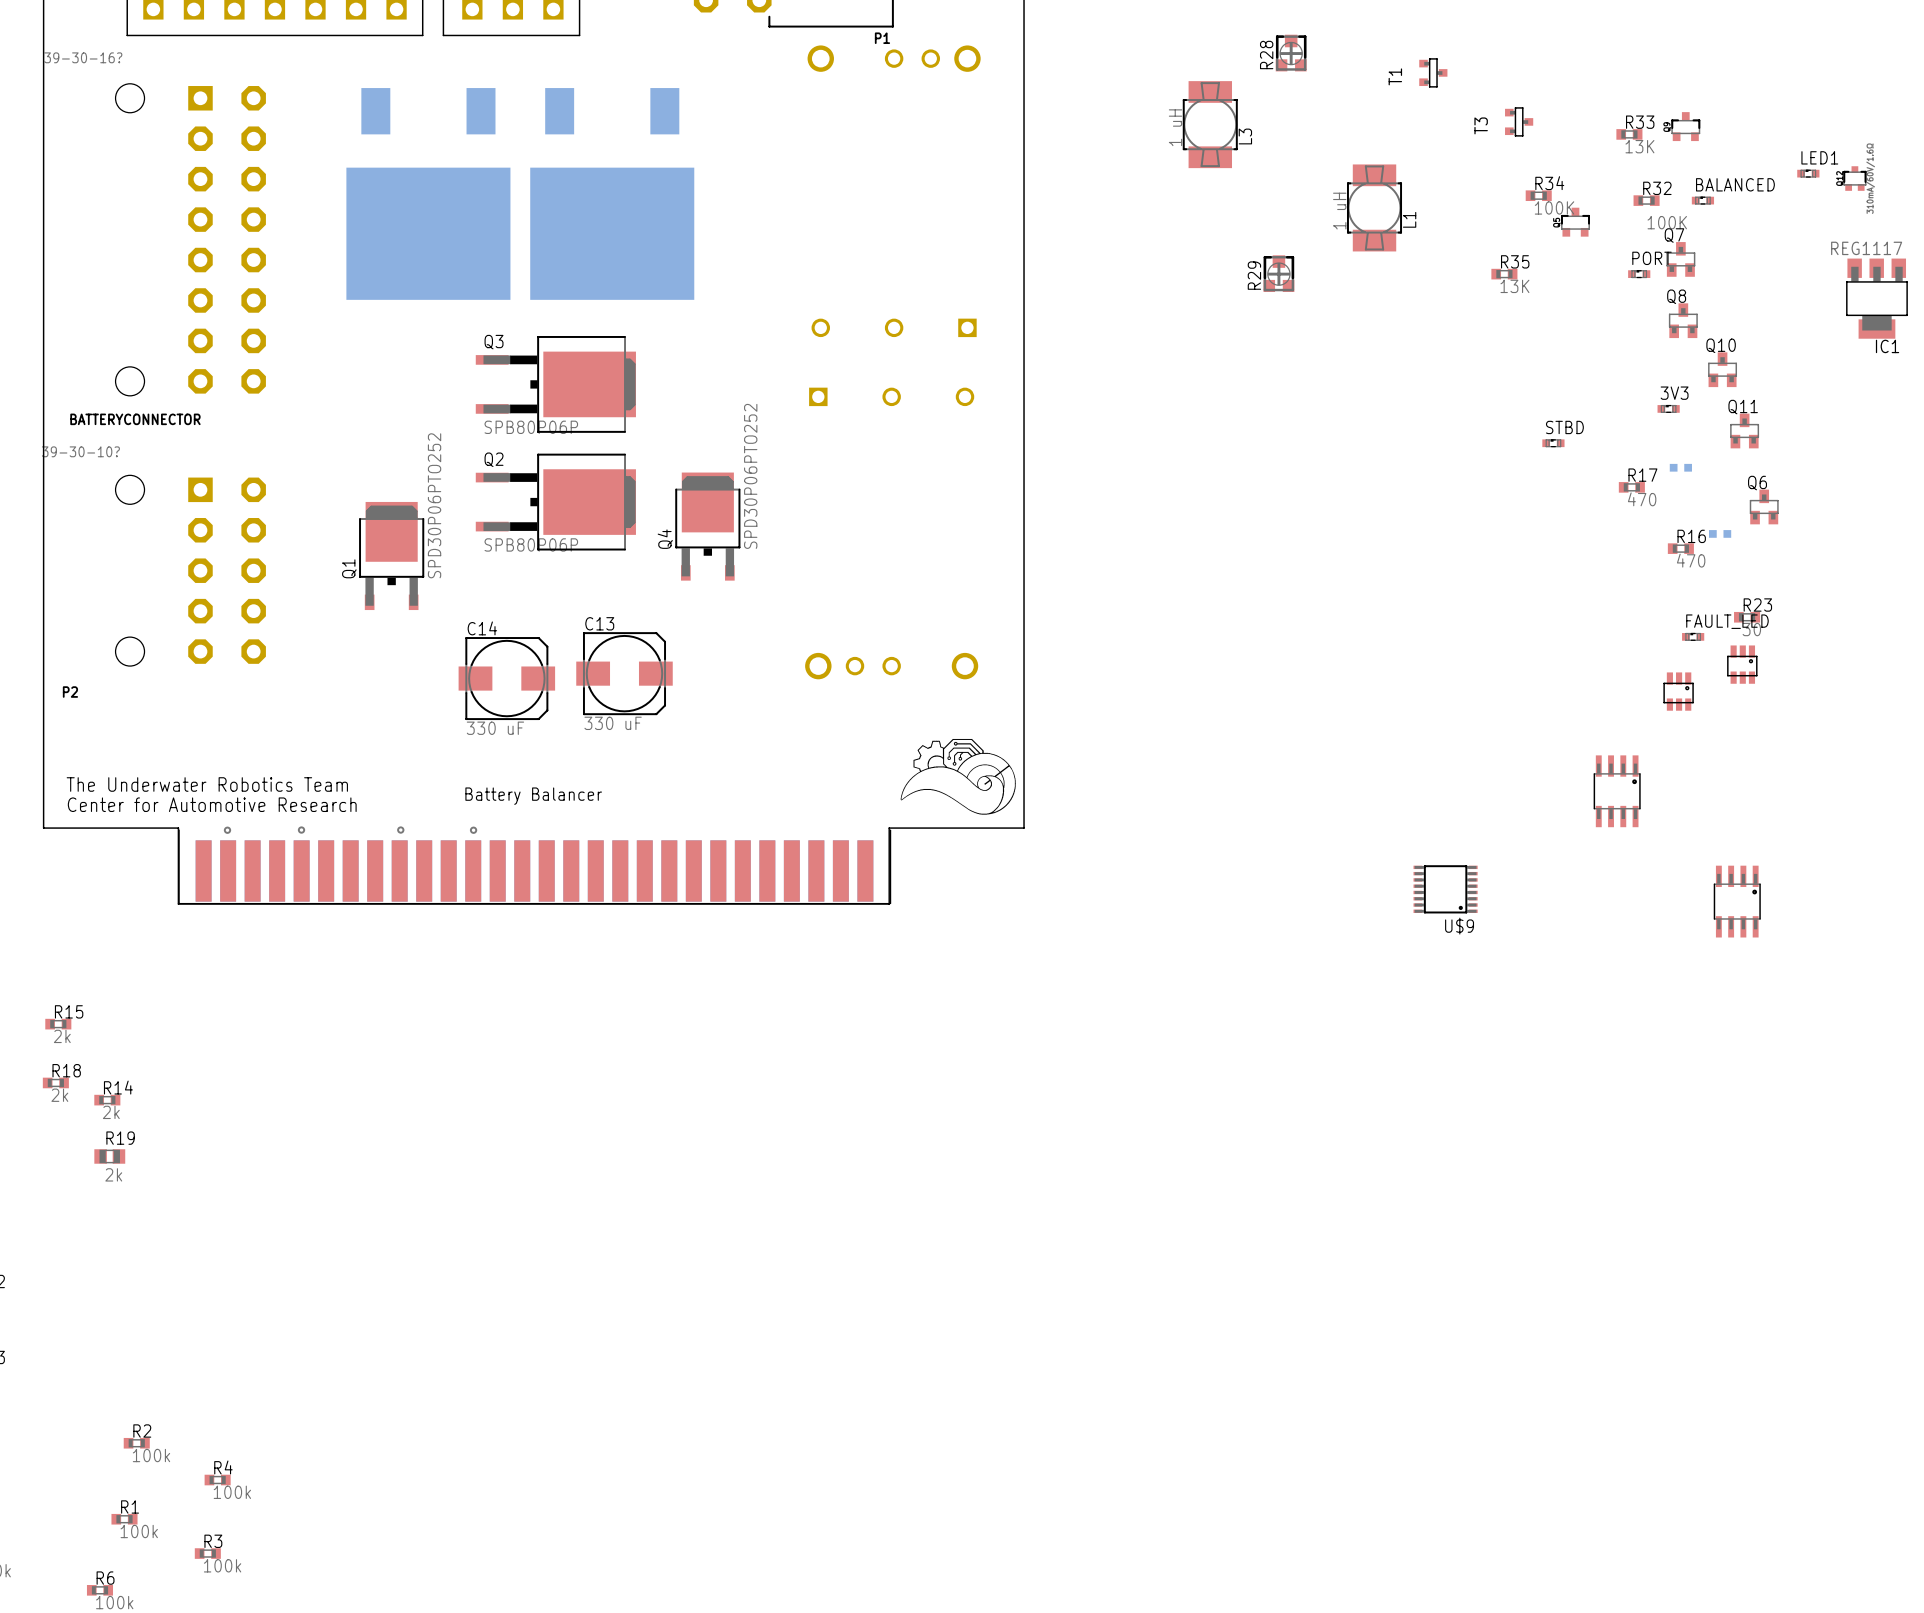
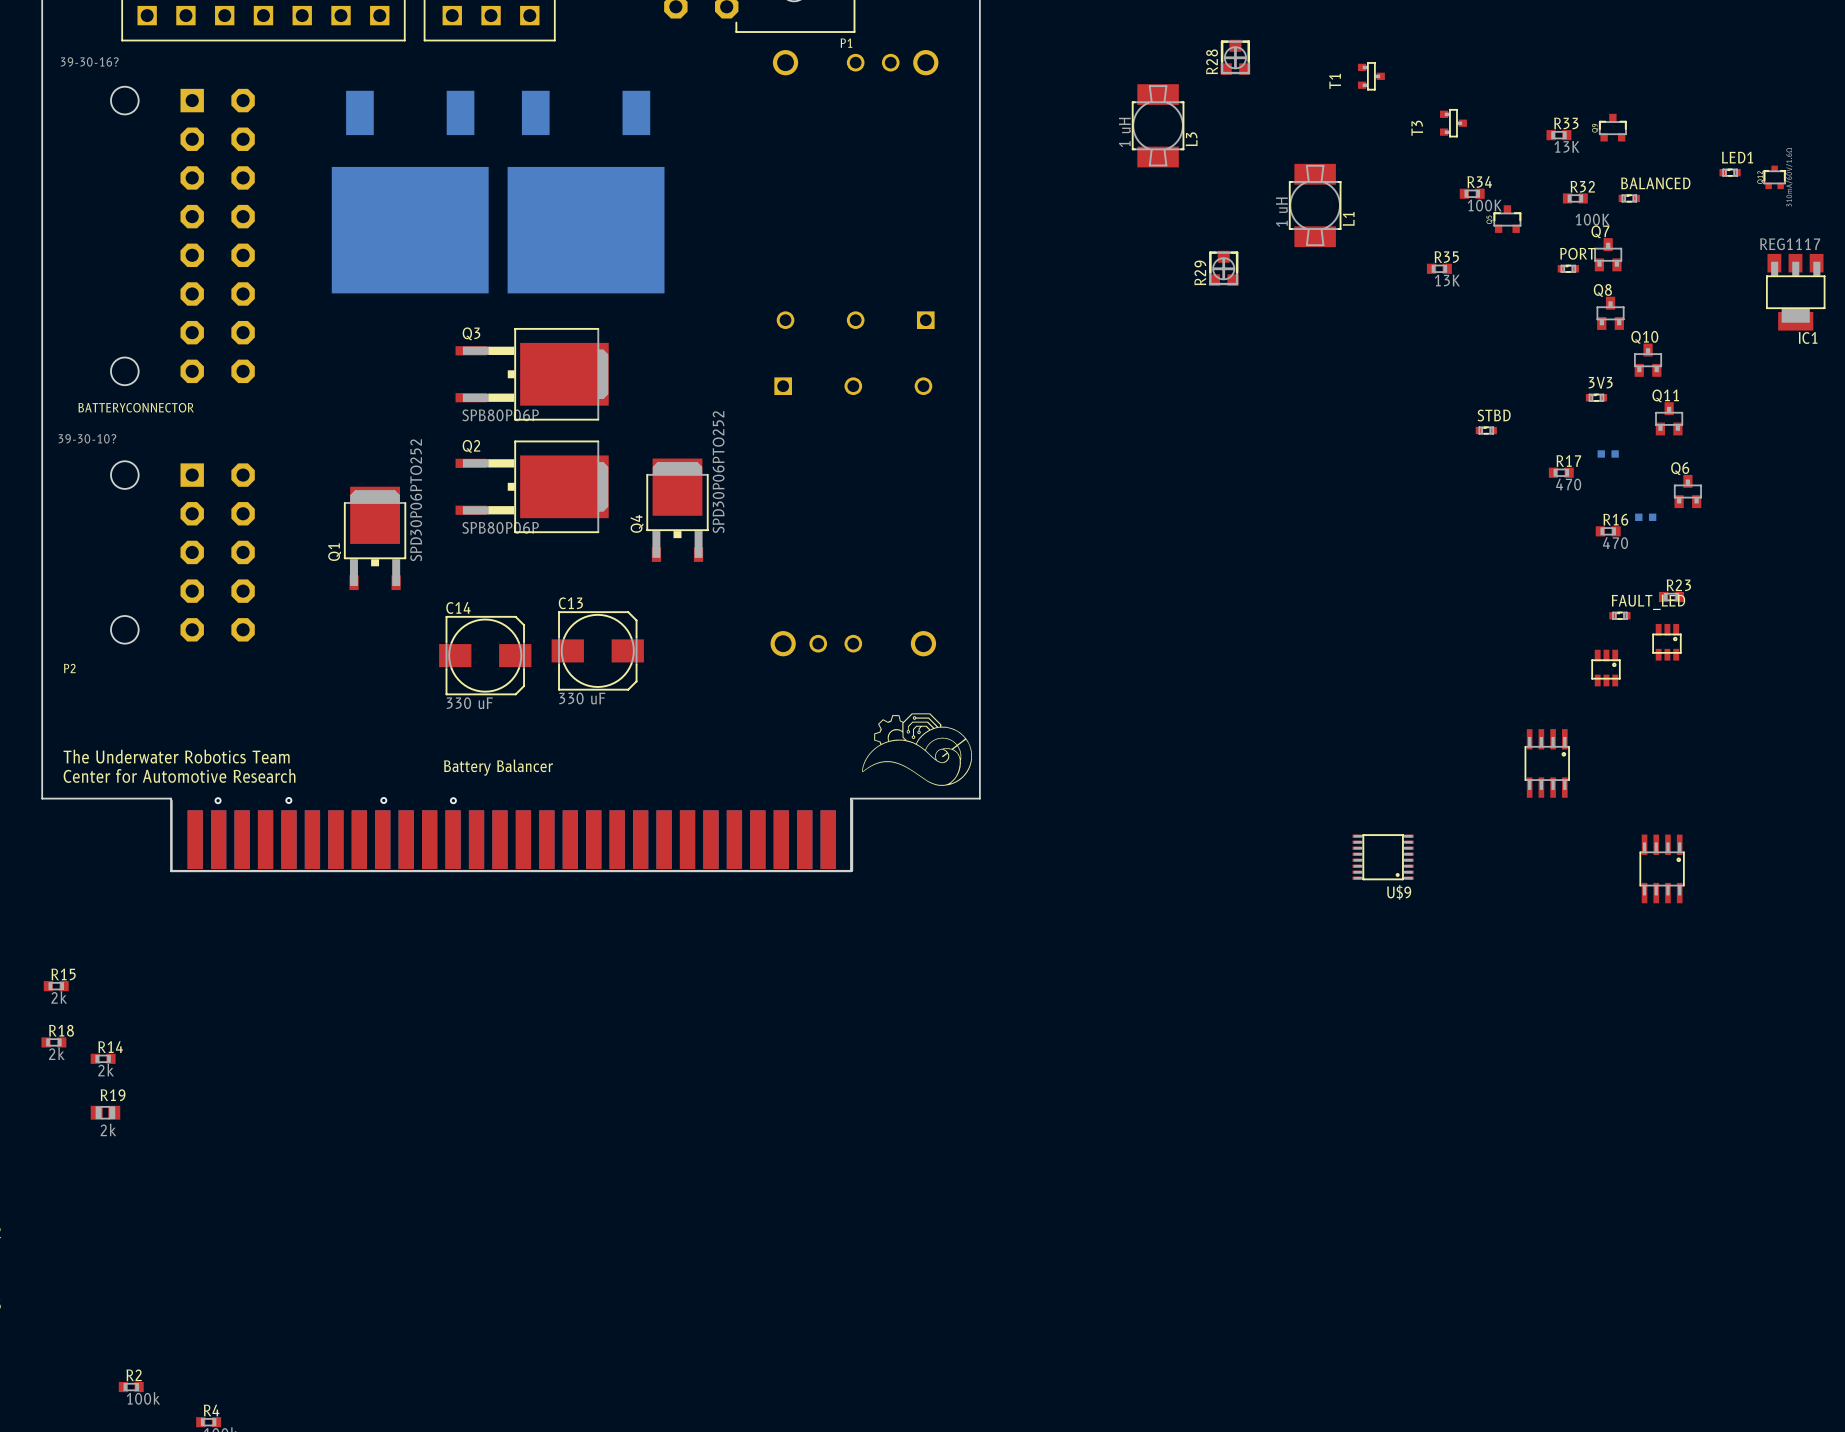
R23 value: 30 (1751, 629) -> none

